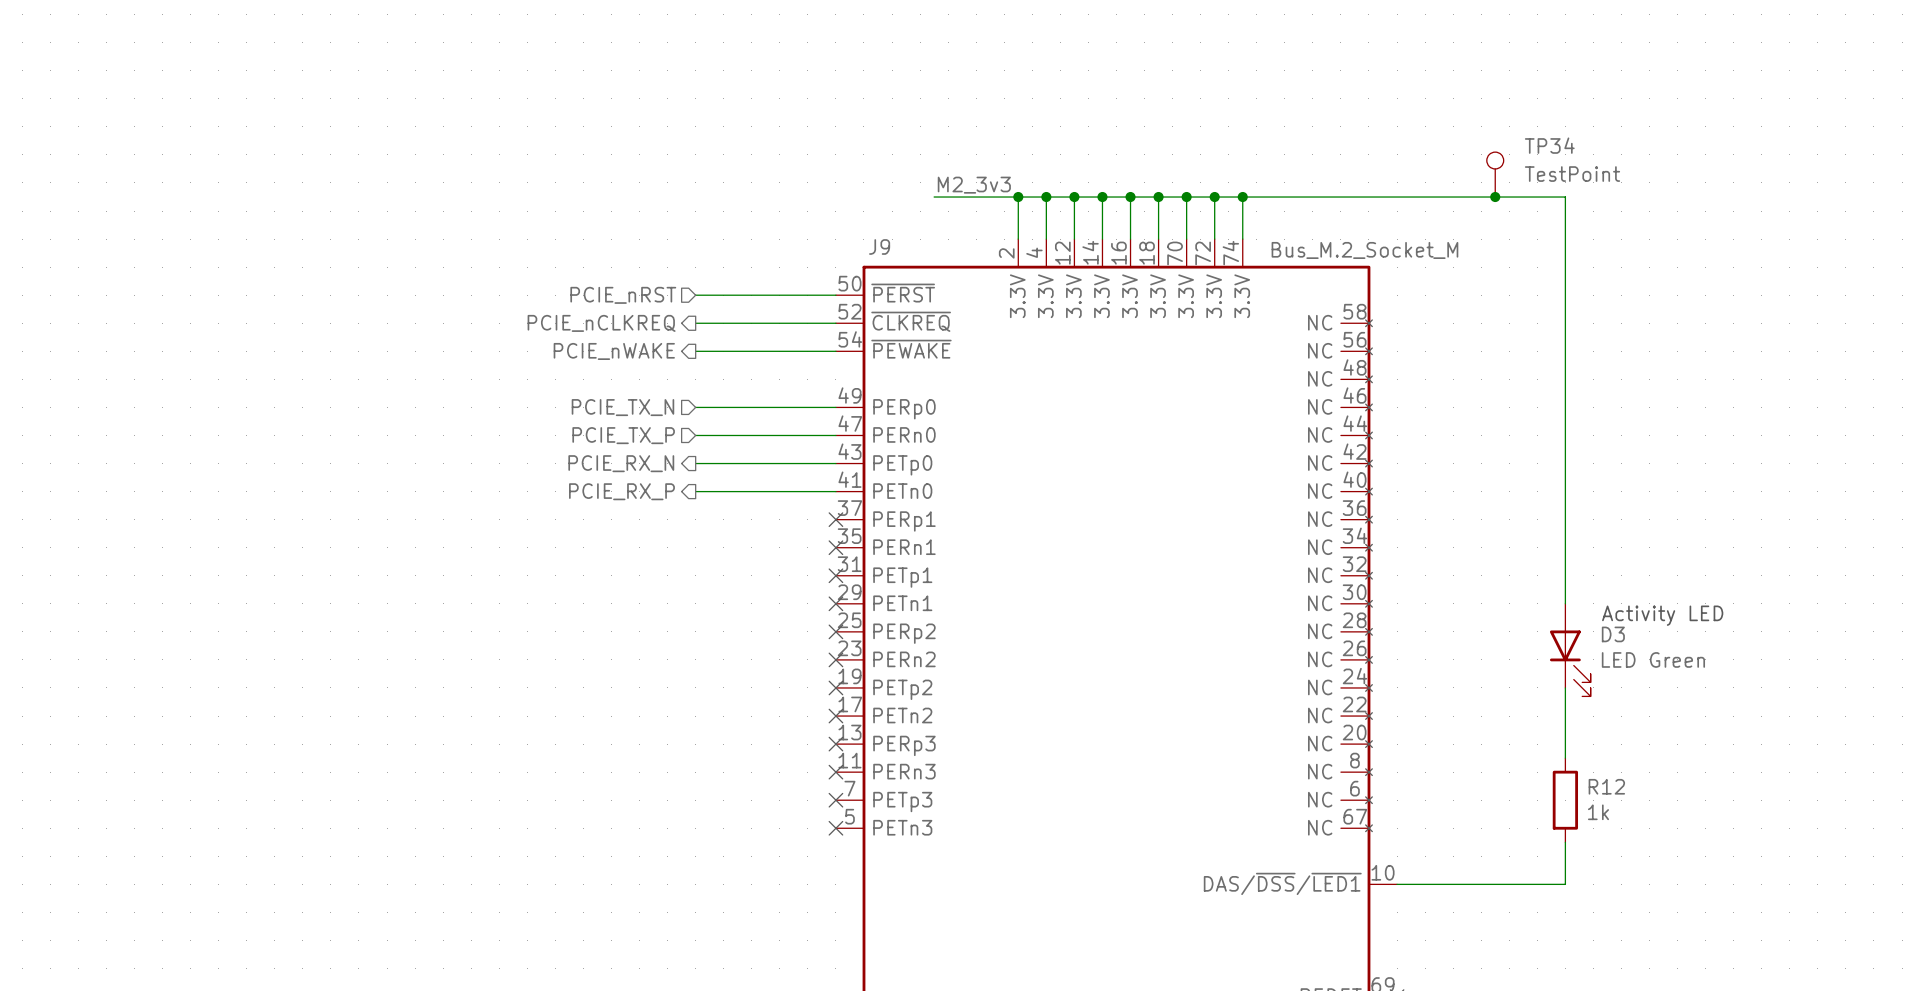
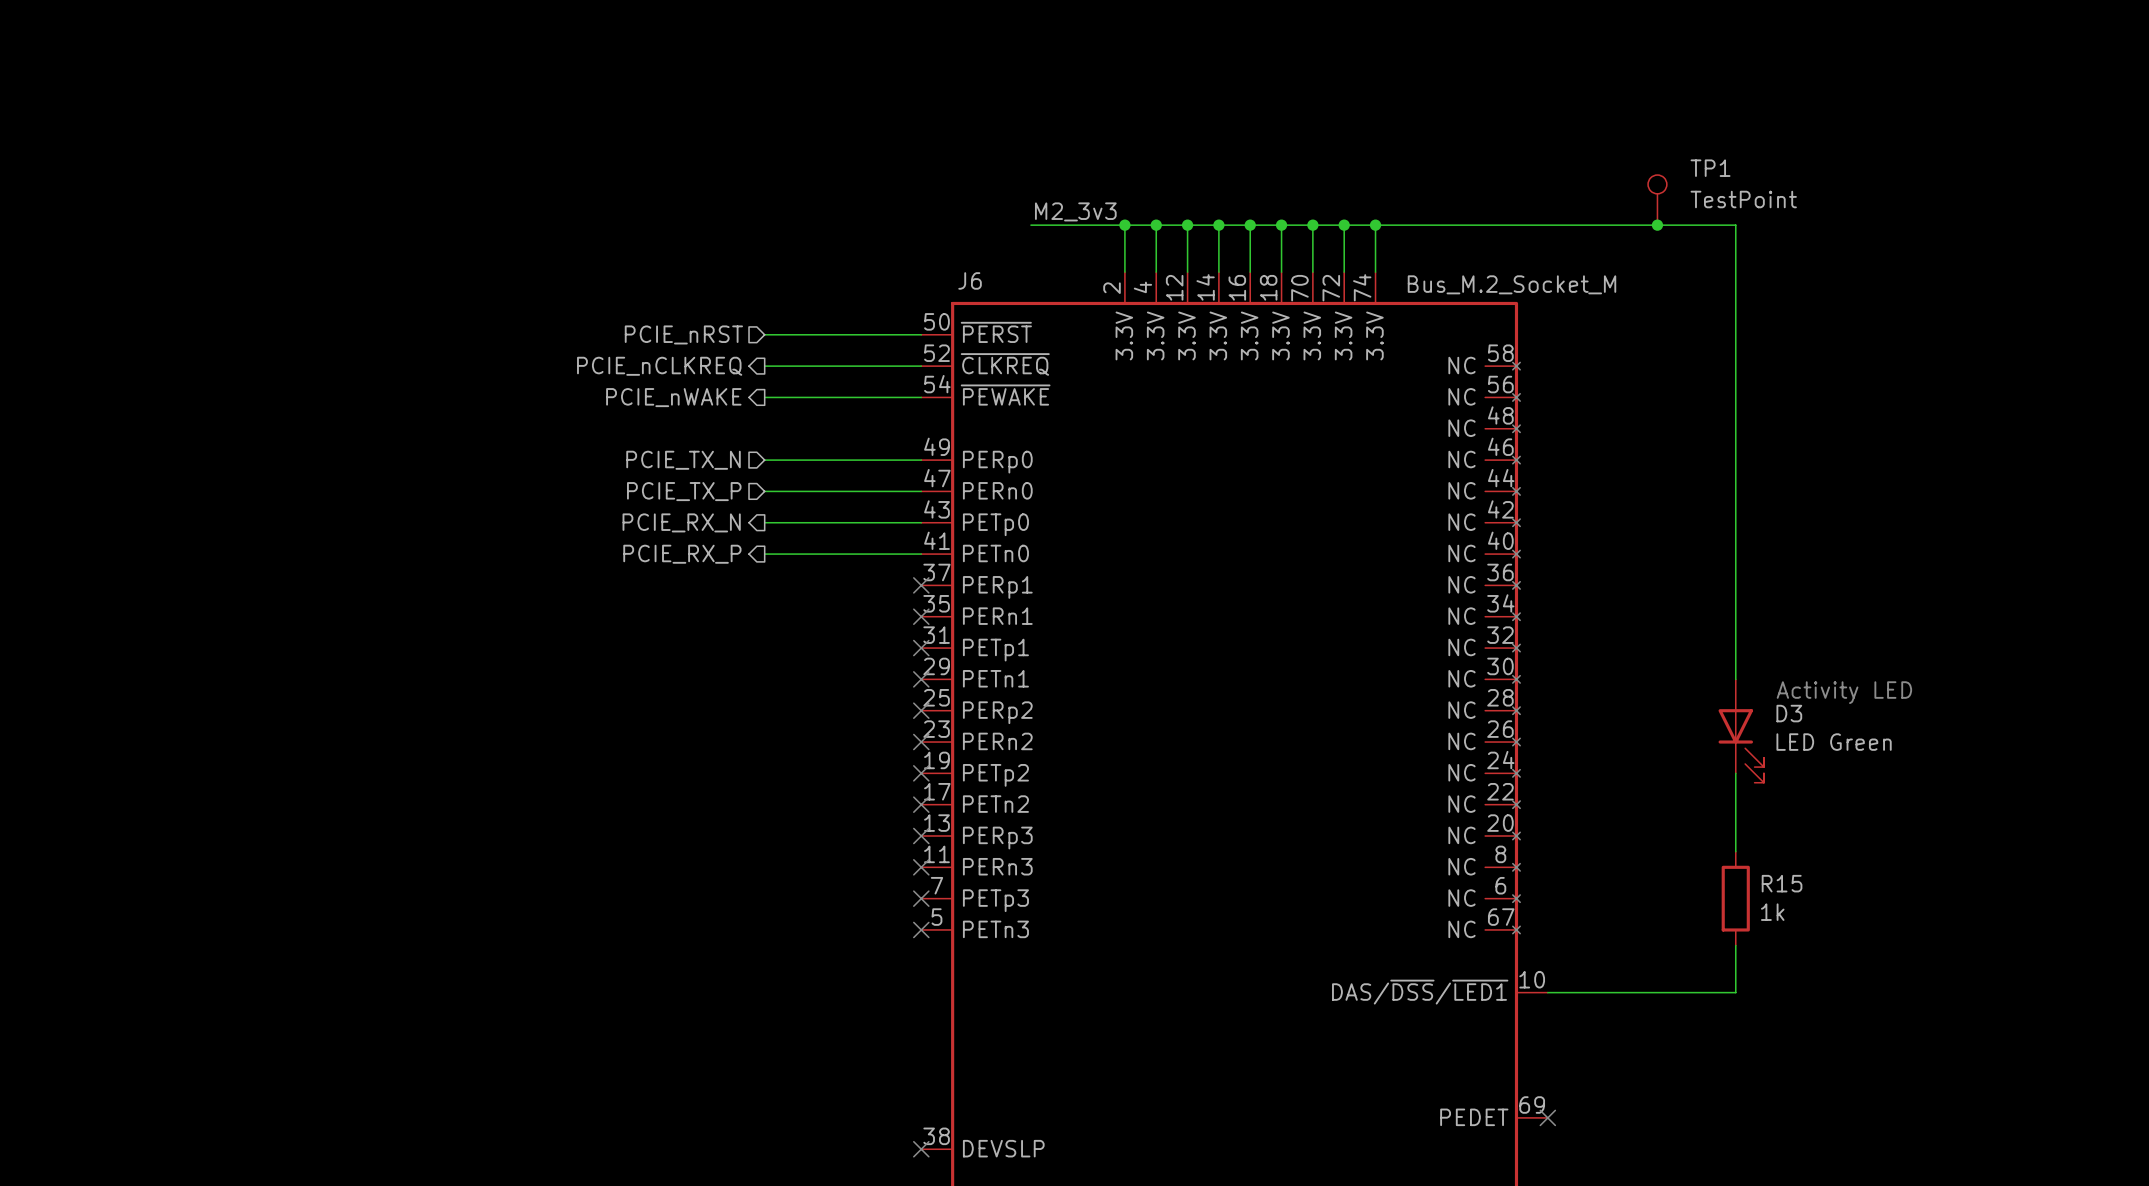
TP34 name: TP34 (1549, 145) -> TP1 (1710, 168)
J9 name: J9 (879, 246) -> J6 (970, 280)
R12 name: R12 (1606, 786) -> R15 (1782, 883)

